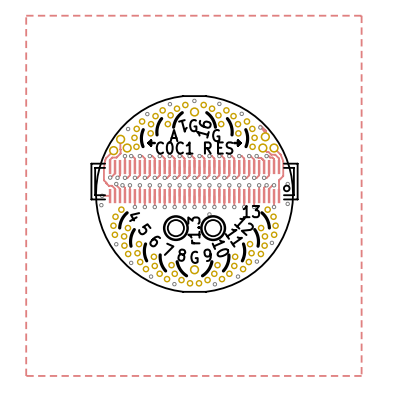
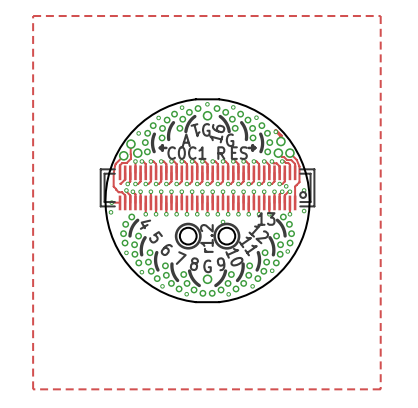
via: (110, 177) -> none
via: none -> (286, 186)
text: r1.3 (193, 230) -> r1.2 (206, 238)

